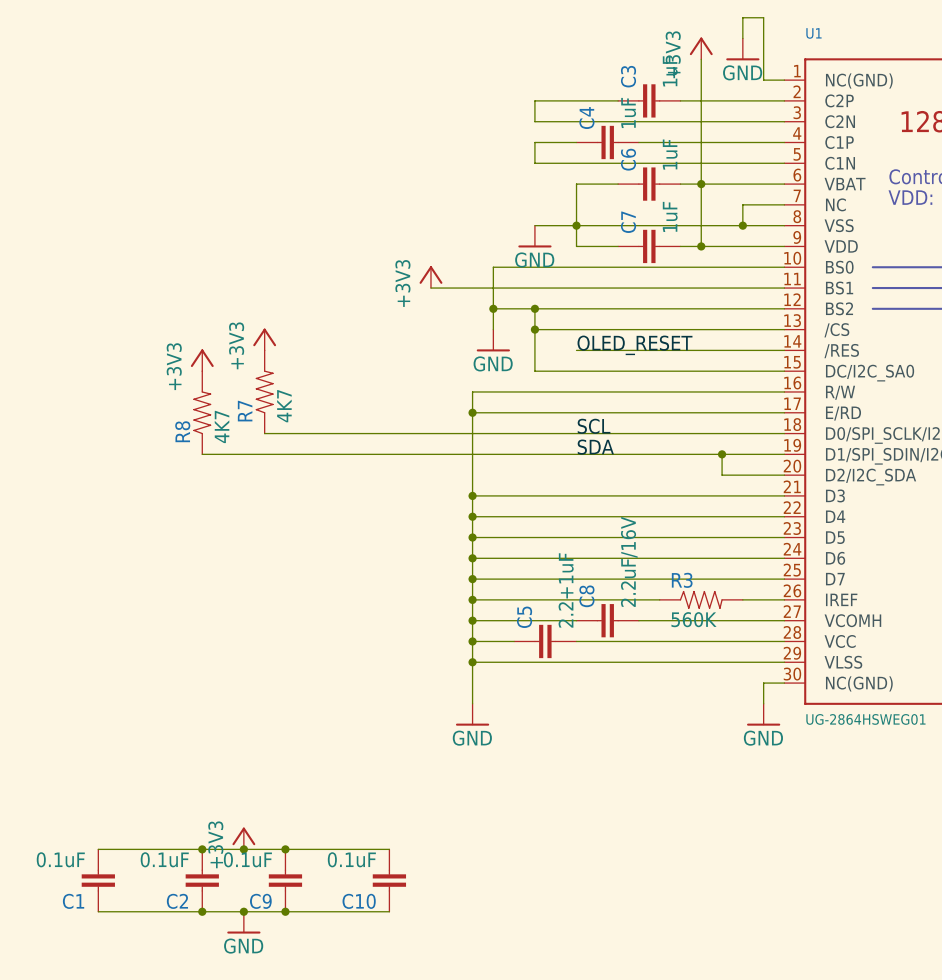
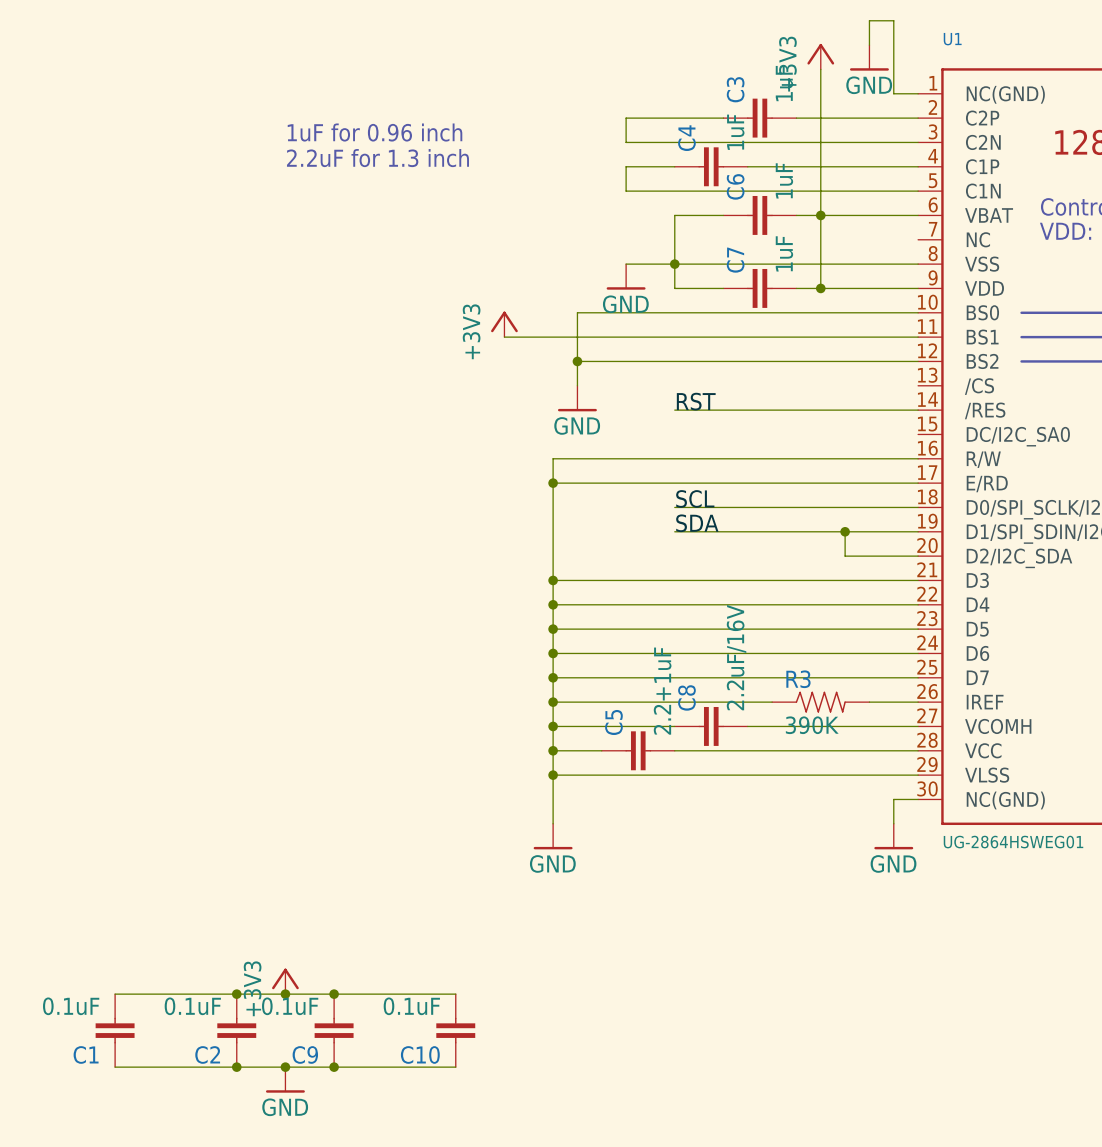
text: none -> 1uF for 0.96 inch (375, 132)
text: none -> 2.2uF for 1.3 inch (377, 158)
wire: (784, 204) (742, 204) (742, 225) -> none
junction: (742, 225) -> none
wire: (534, 308) (534, 371) (784, 371) -> none
junction: (534, 308) -> none
wire: (534, 329) (784, 329) -> none
junction: (534, 329) -> none
power symbol: +3V3 (264, 339) -> none
label: OLED_RESET (634, 345) -> RST (696, 401)
power symbol: +3V3 (202, 360) -> none
R7: 4K7 (264, 391) -> none
R8: 4K7 (202, 412) -> none
wire: (264, 433) (576, 433) -> none
wire: (202, 454) (576, 454) -> none
R3 value: 560K (694, 619) -> 390K (812, 725)

